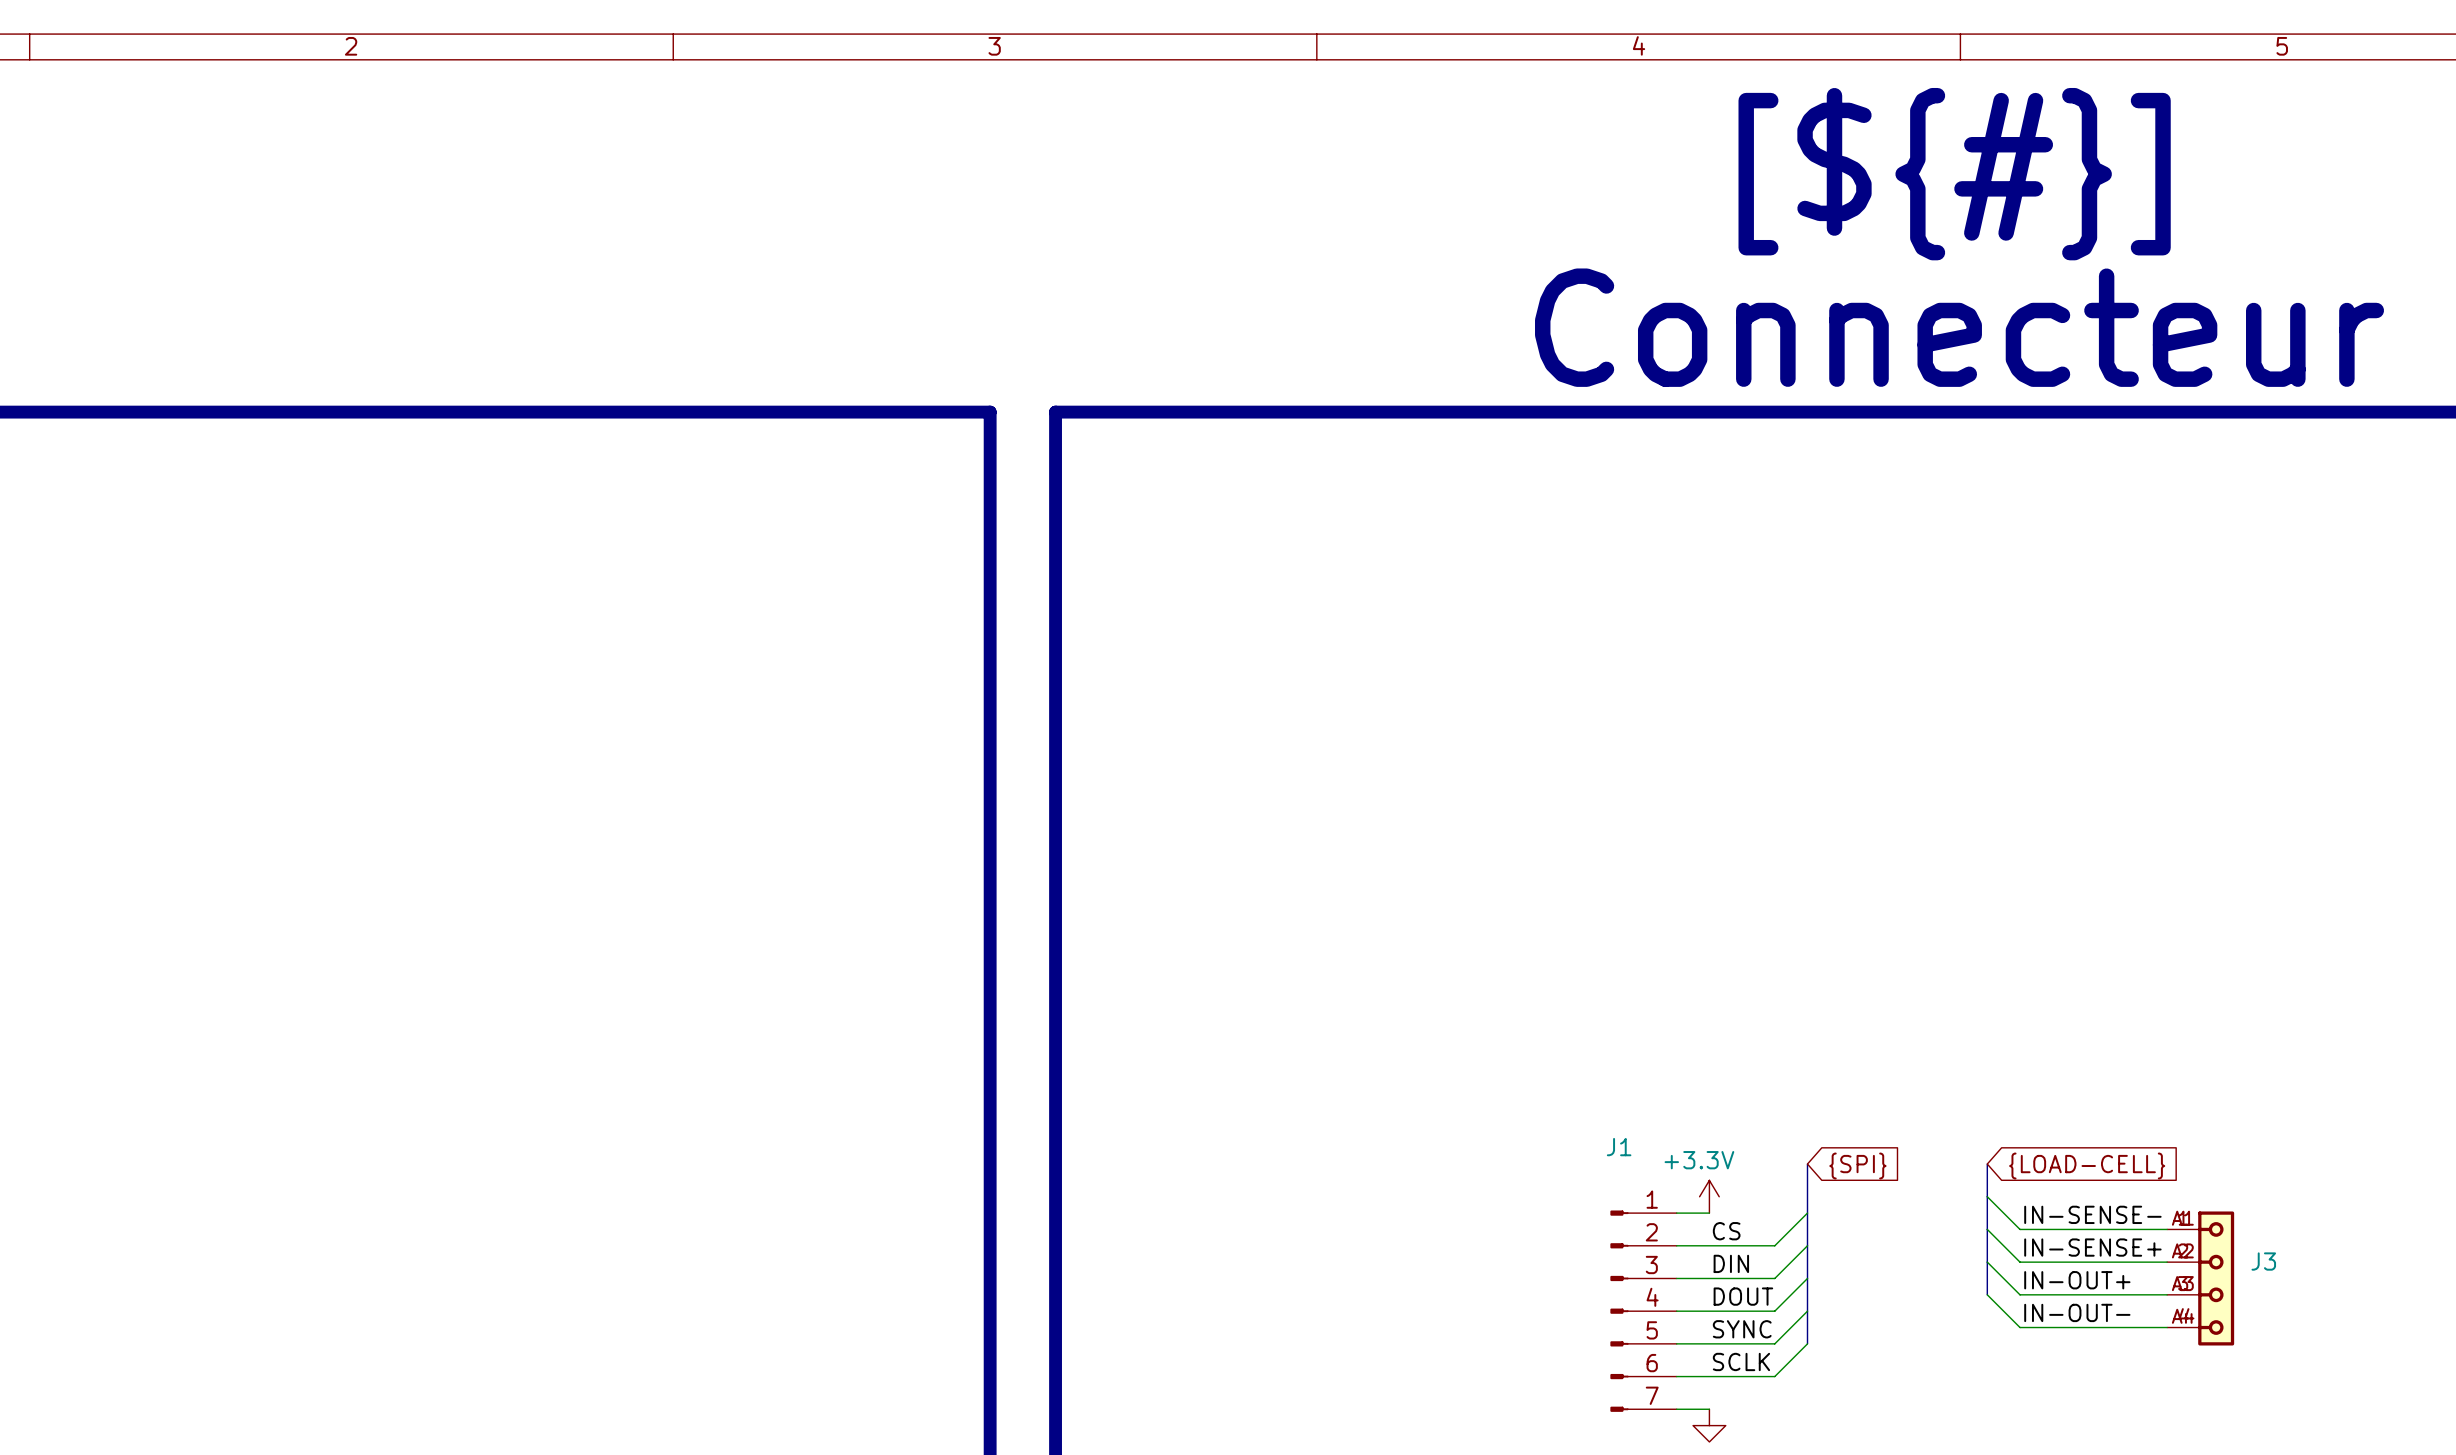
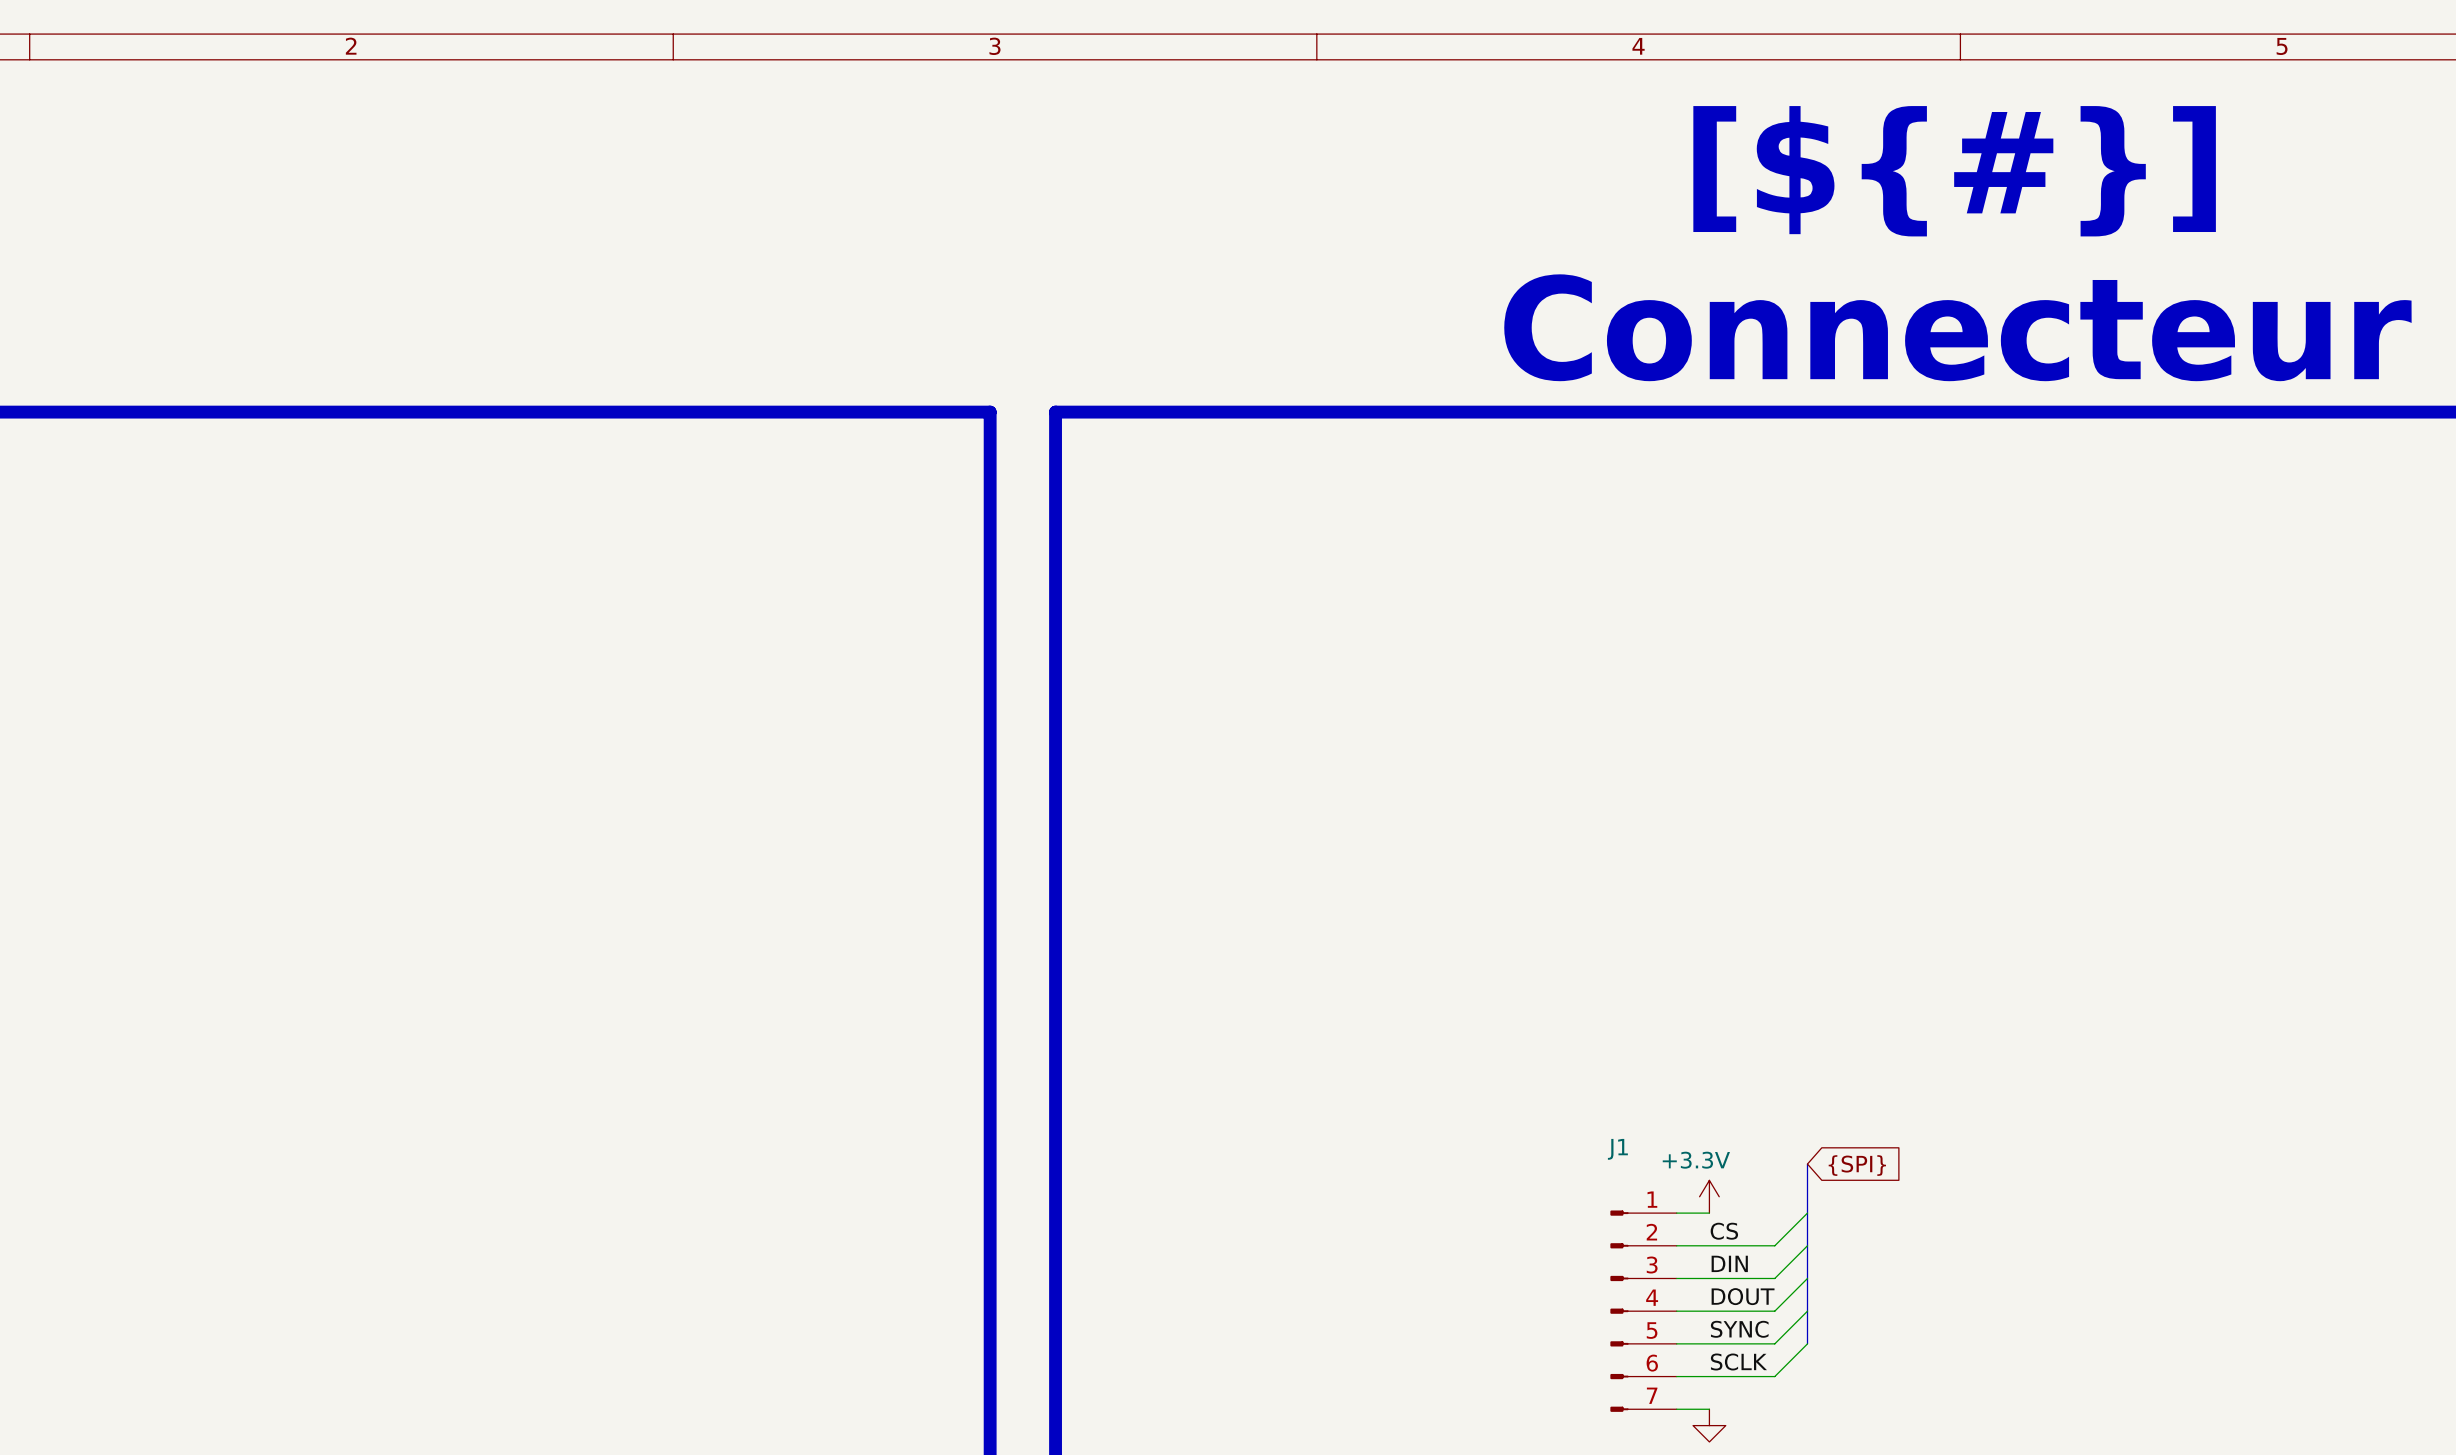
bus: (1987, 1164) (1987, 1294) -> none
global label: {LOAD-CELL} (2087, 1166) -> none
wire: (1987, 1196) (2020, 1229) (2167, 1229) -> none
label: IN-SENSE- (2092, 1214) -> none
wire: (1987, 1229) (2020, 1262) (2167, 1262) -> none
label: IN-SENSE+ (2092, 1247) -> none
wire: (1987, 1262) (2020, 1294) (2167, 1294) -> none
J3: (2200, 1278) -> none
label: IN-OUT+ (2077, 1280) -> none
wire: (1987, 1294) (2020, 1327) (2167, 1327) -> none
label: IN-OUT- (2077, 1312) -> none

